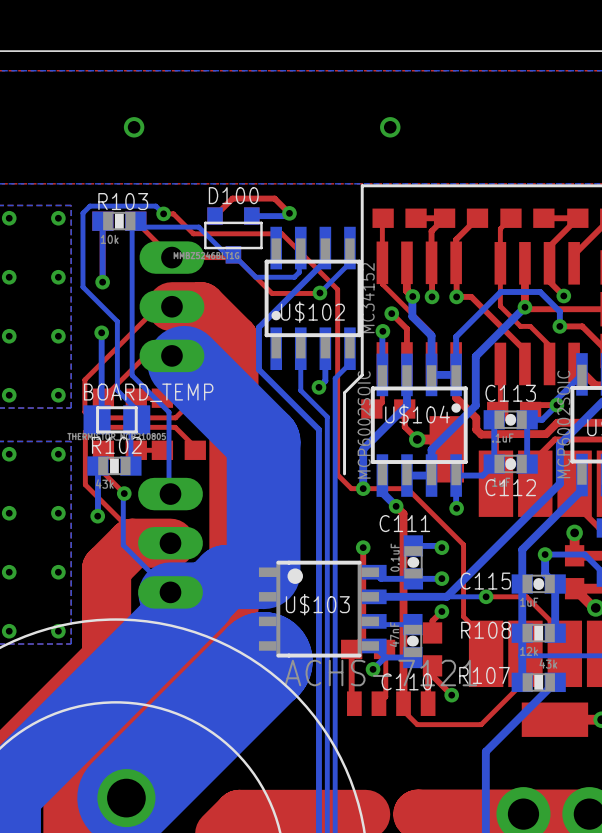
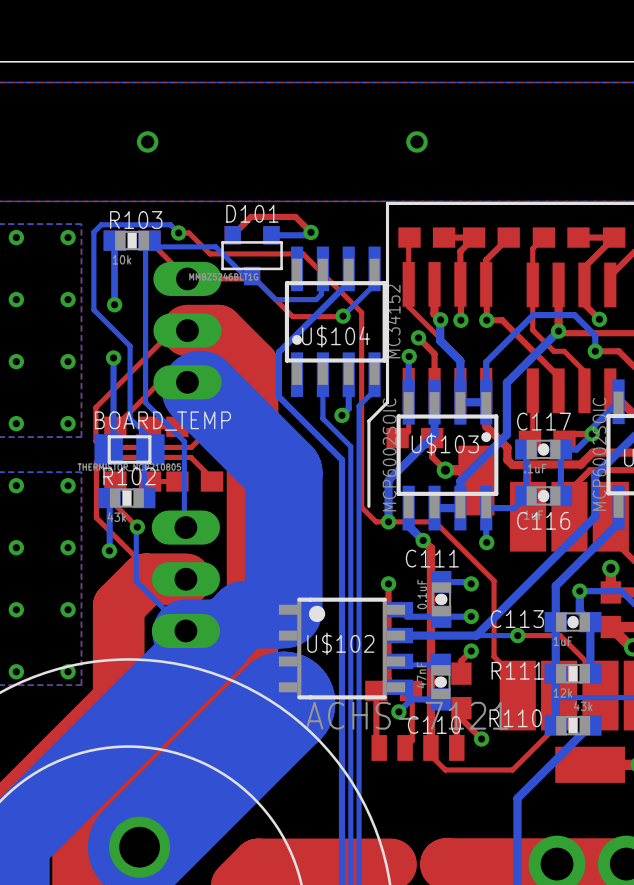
D100 name: D100 (233, 195) -> D101 (252, 213)
U$102 name: U$102 (312, 312) -> U$104 (336, 336)
C113 name: C113 (510, 393) -> C117 (543, 421)
U$104 name: U$104 (417, 414) -> U$103 (445, 444)
C112 name: C112 (510, 487) -> C116 (543, 520)
C115 name: C115 (485, 581) -> C113 (517, 619)
U$103 name: U$103 (317, 604) -> U$102 (340, 643)
R108 name: R108 (486, 630) -> R111 (517, 670)
R107 name: R107 (484, 675) -> R110 (515, 718)

